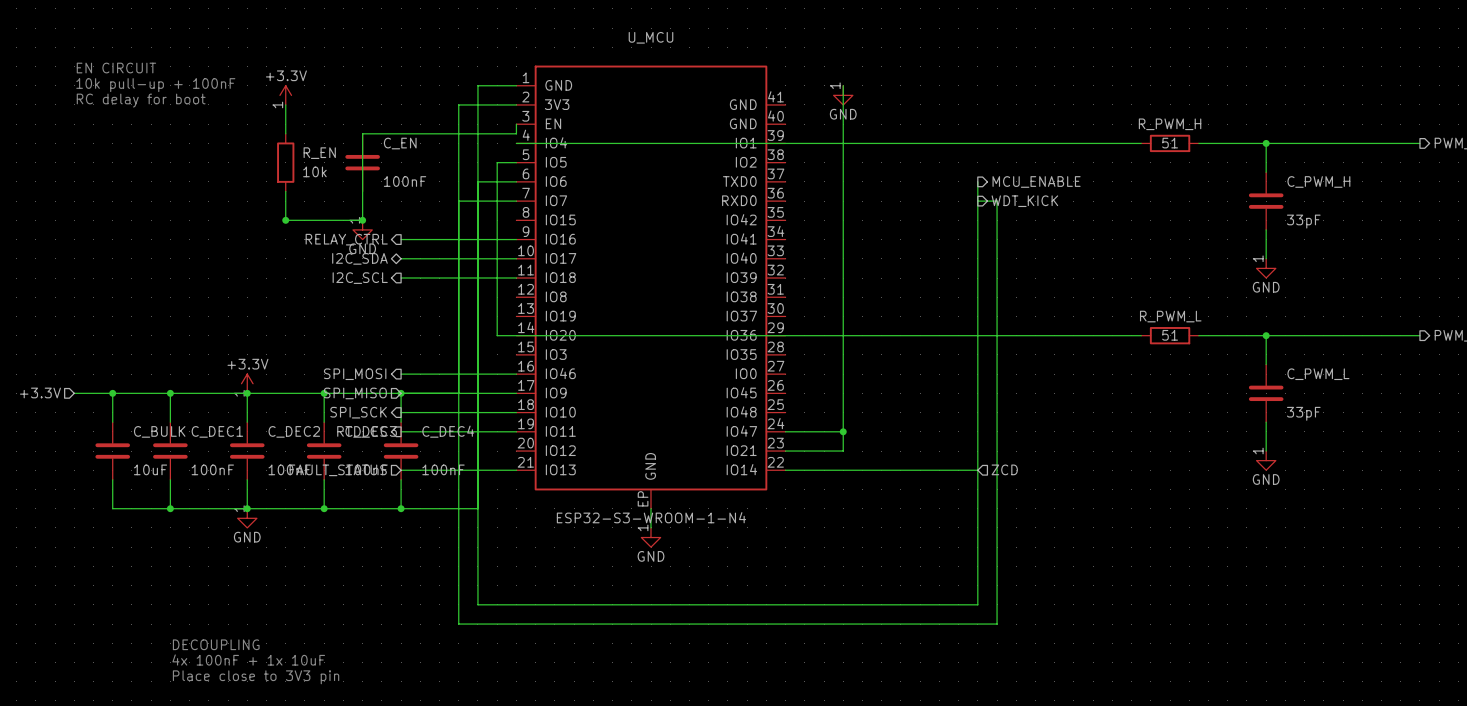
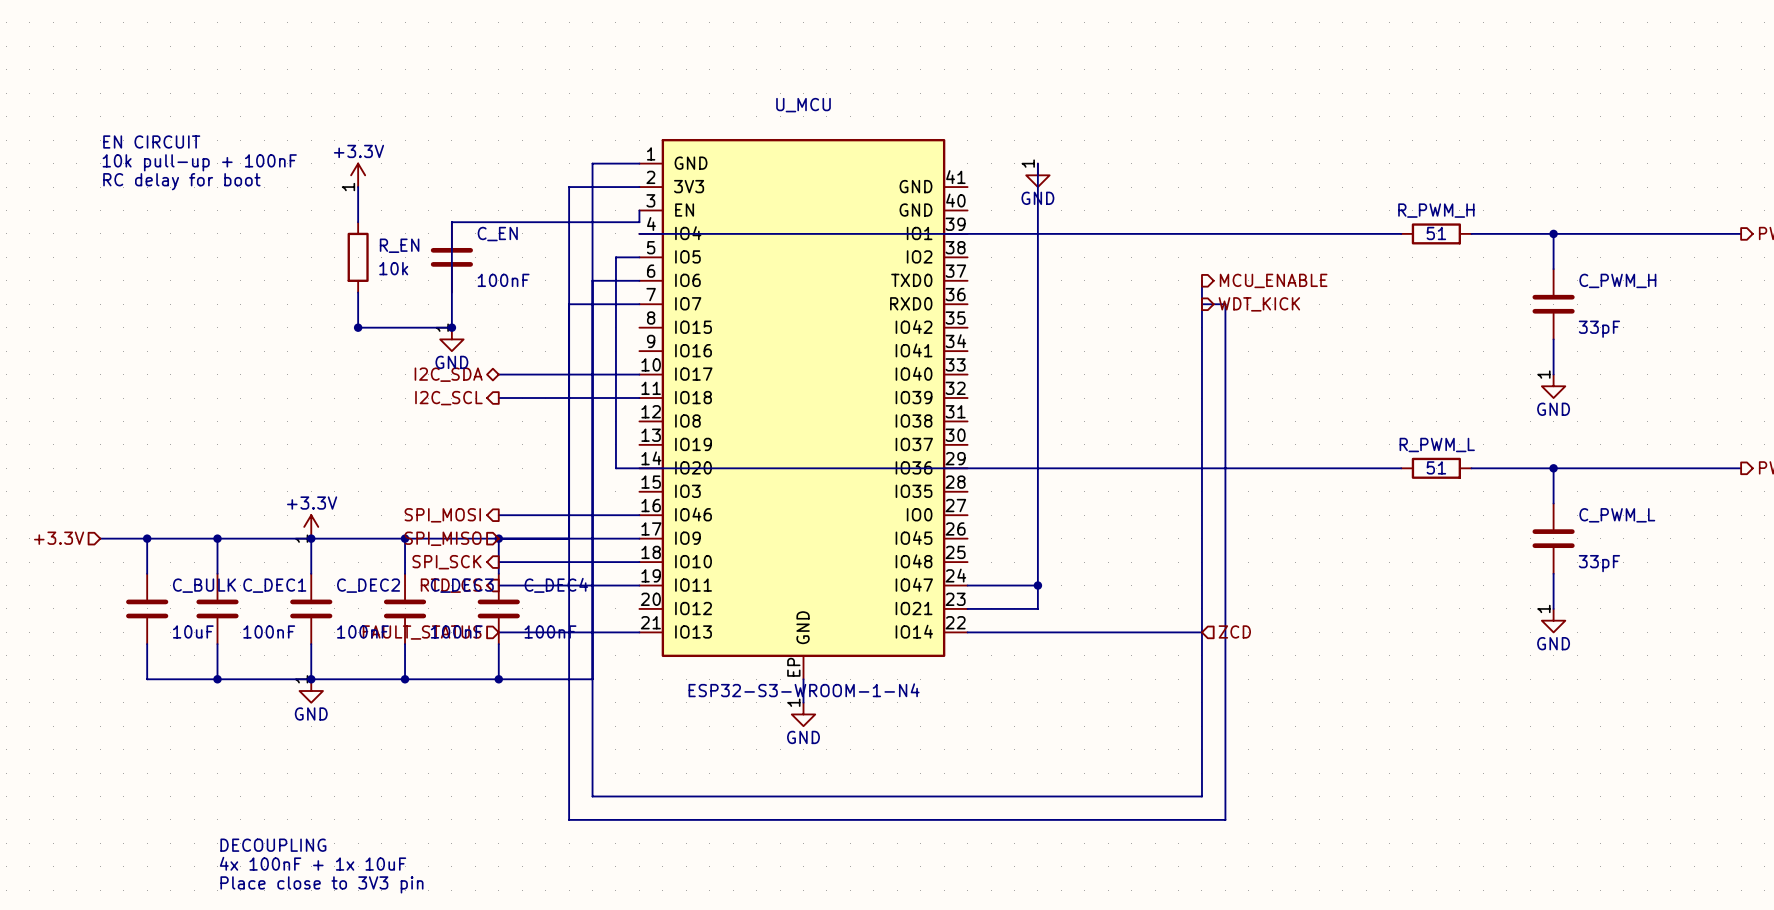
hierarchical label: RELAY_CTRL (346, 239) -> none
wire: (401, 239) (516, 239) -> none

